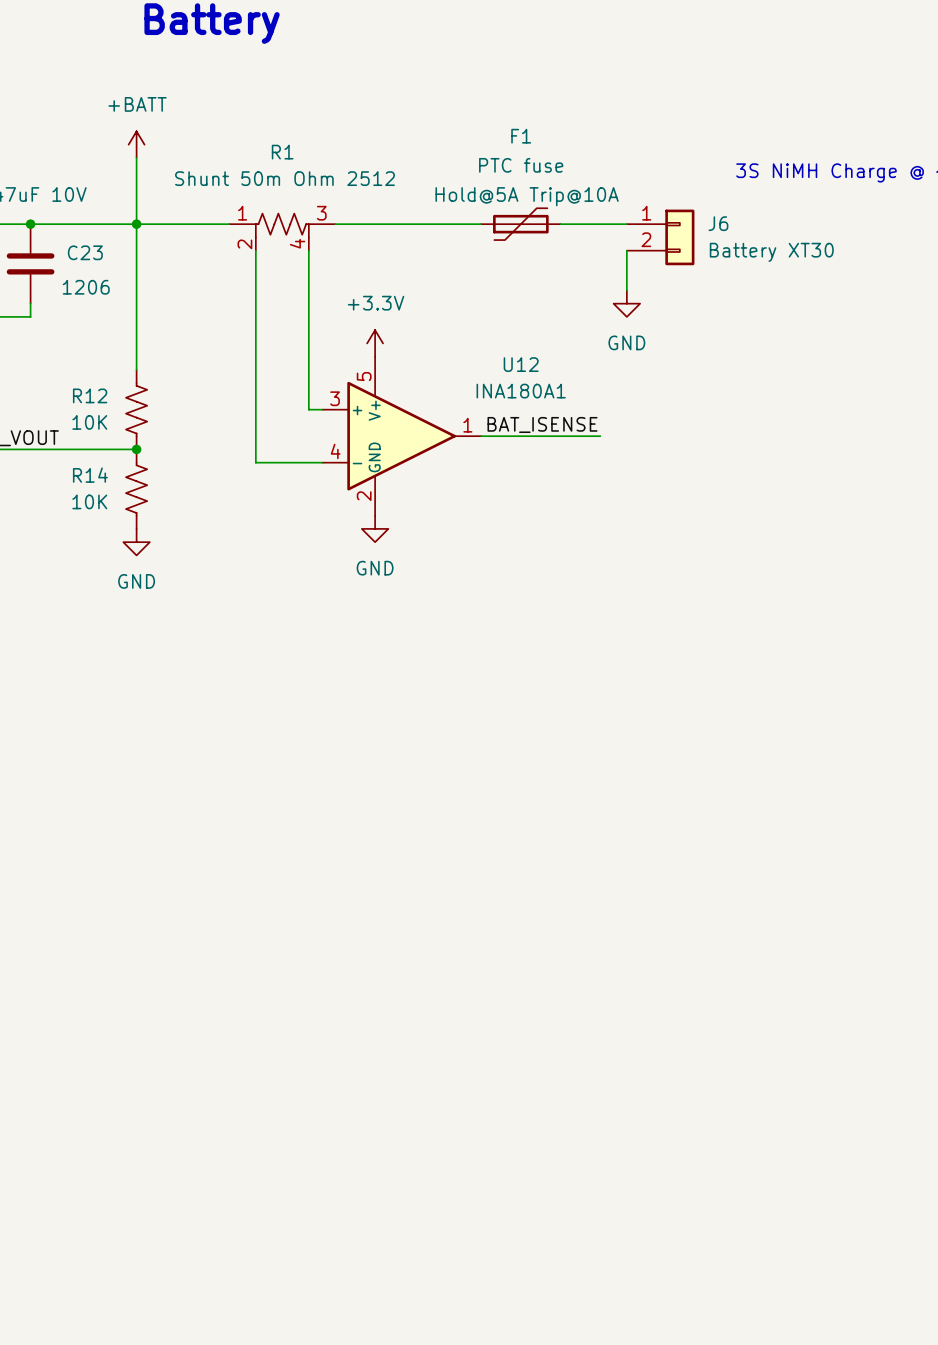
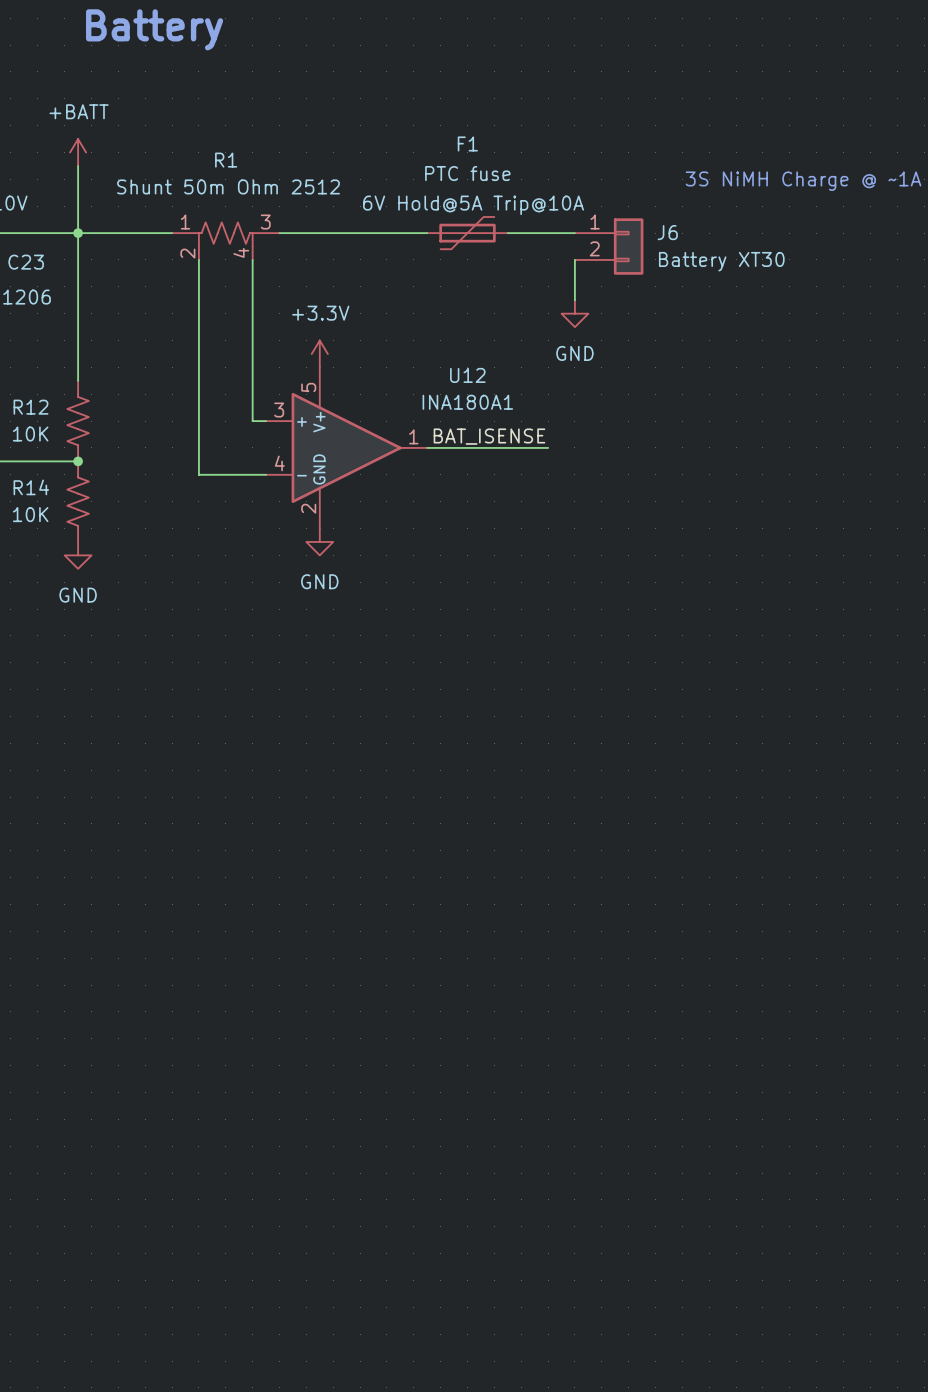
F1 text: Hold@5A Trip@10A (527, 196) -> 6V Hold@5A Trip@10A (473, 205)

